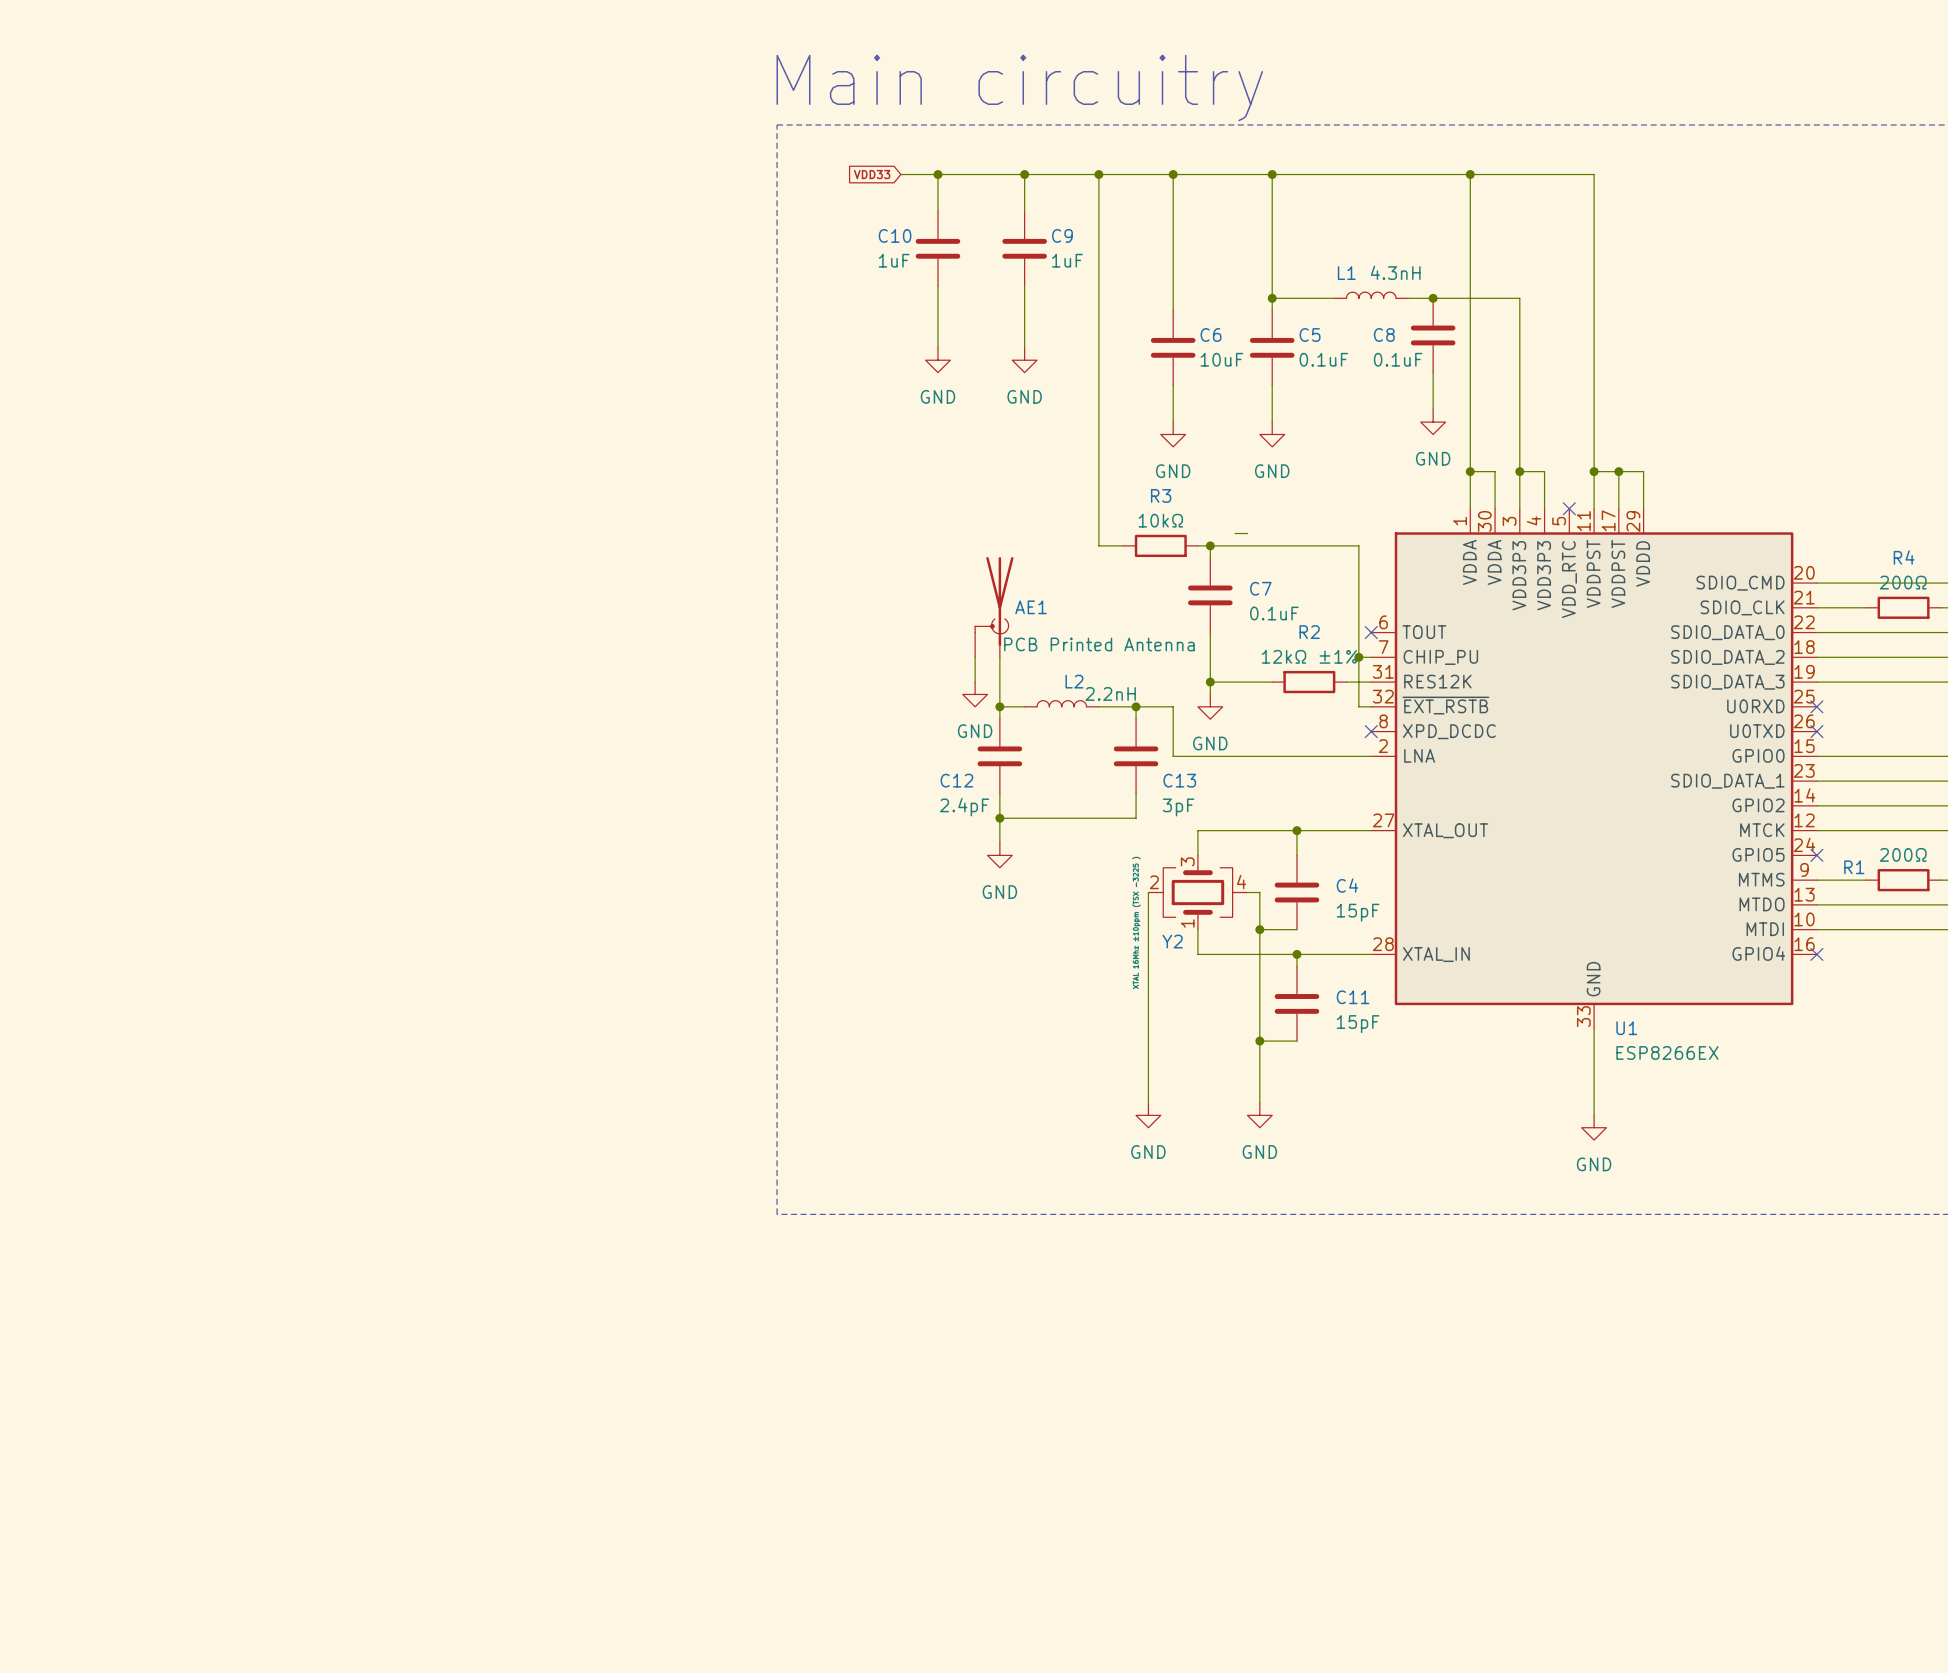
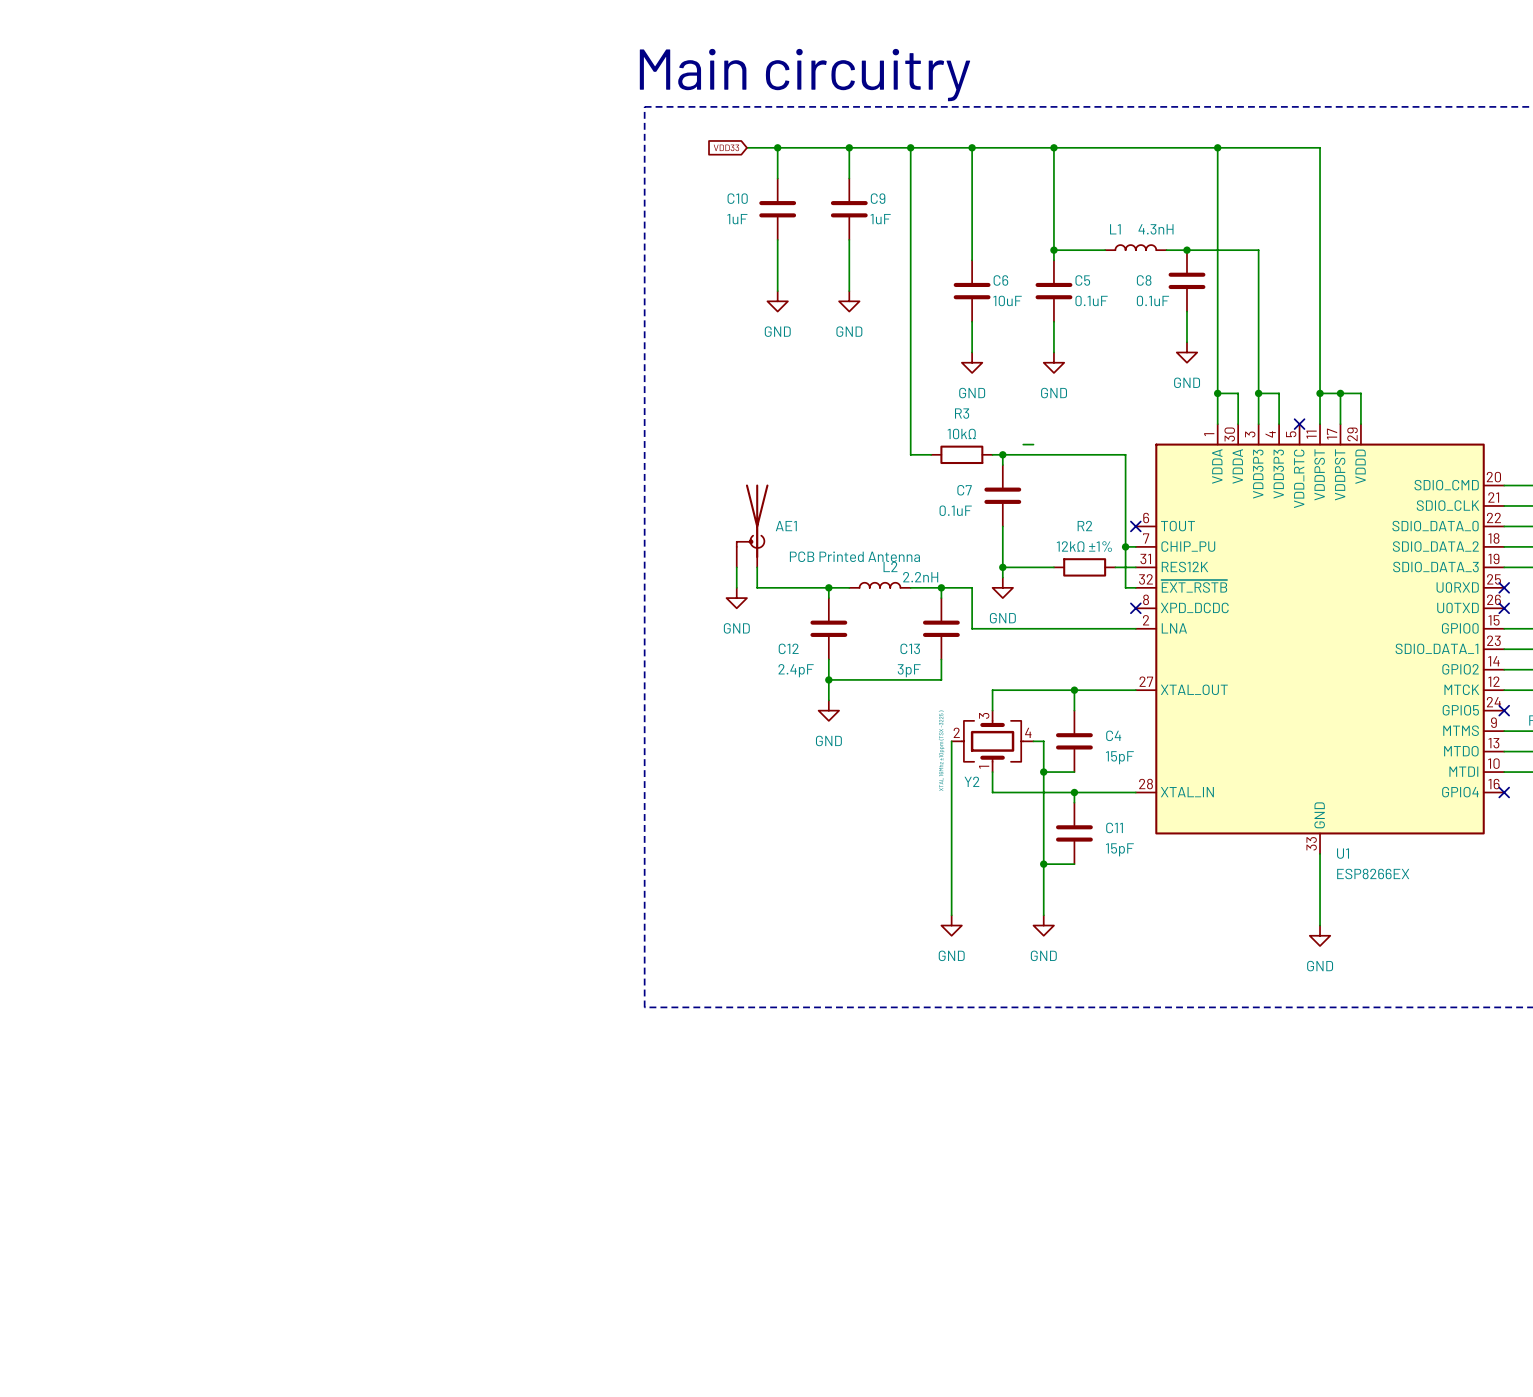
C7 name position: C7 (1260, 588) -> C7 (964, 490)
AE1 position: (994, 607) -> (752, 525)
C7 value position: 0.1uF (1274, 613) -> 0.1uF (955, 510)
wire: (975, 657) (975, 682) -> (736, 567) (736, 587)
wire: (999, 657) (999, 706) -> (757, 567) (757, 587) (828, 587)
power symbol position: GND (975, 694) -> GND (736, 598)
C13 name position: C13 (1179, 780) -> C13 (910, 648)
C13 value position: 3pF (1178, 807) -> 3pF (909, 670)

